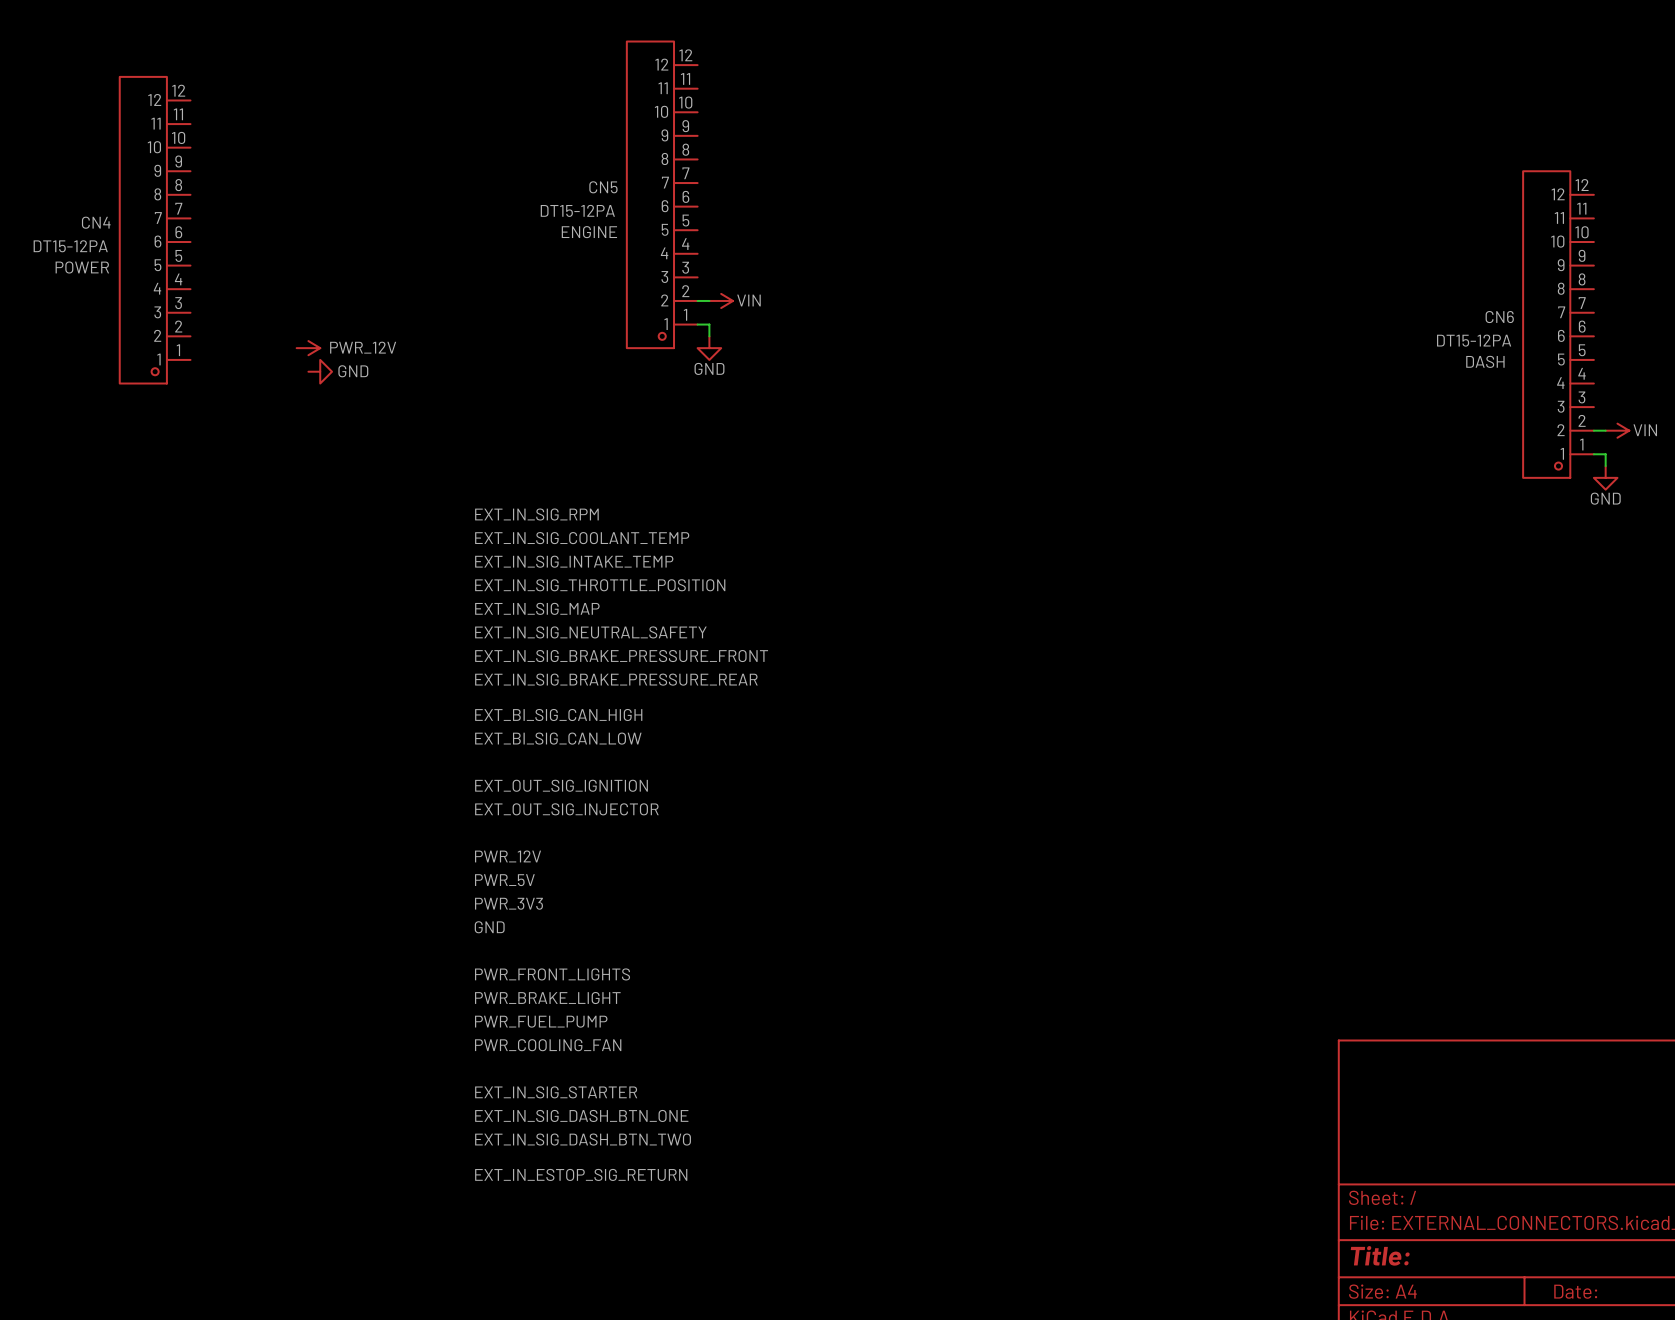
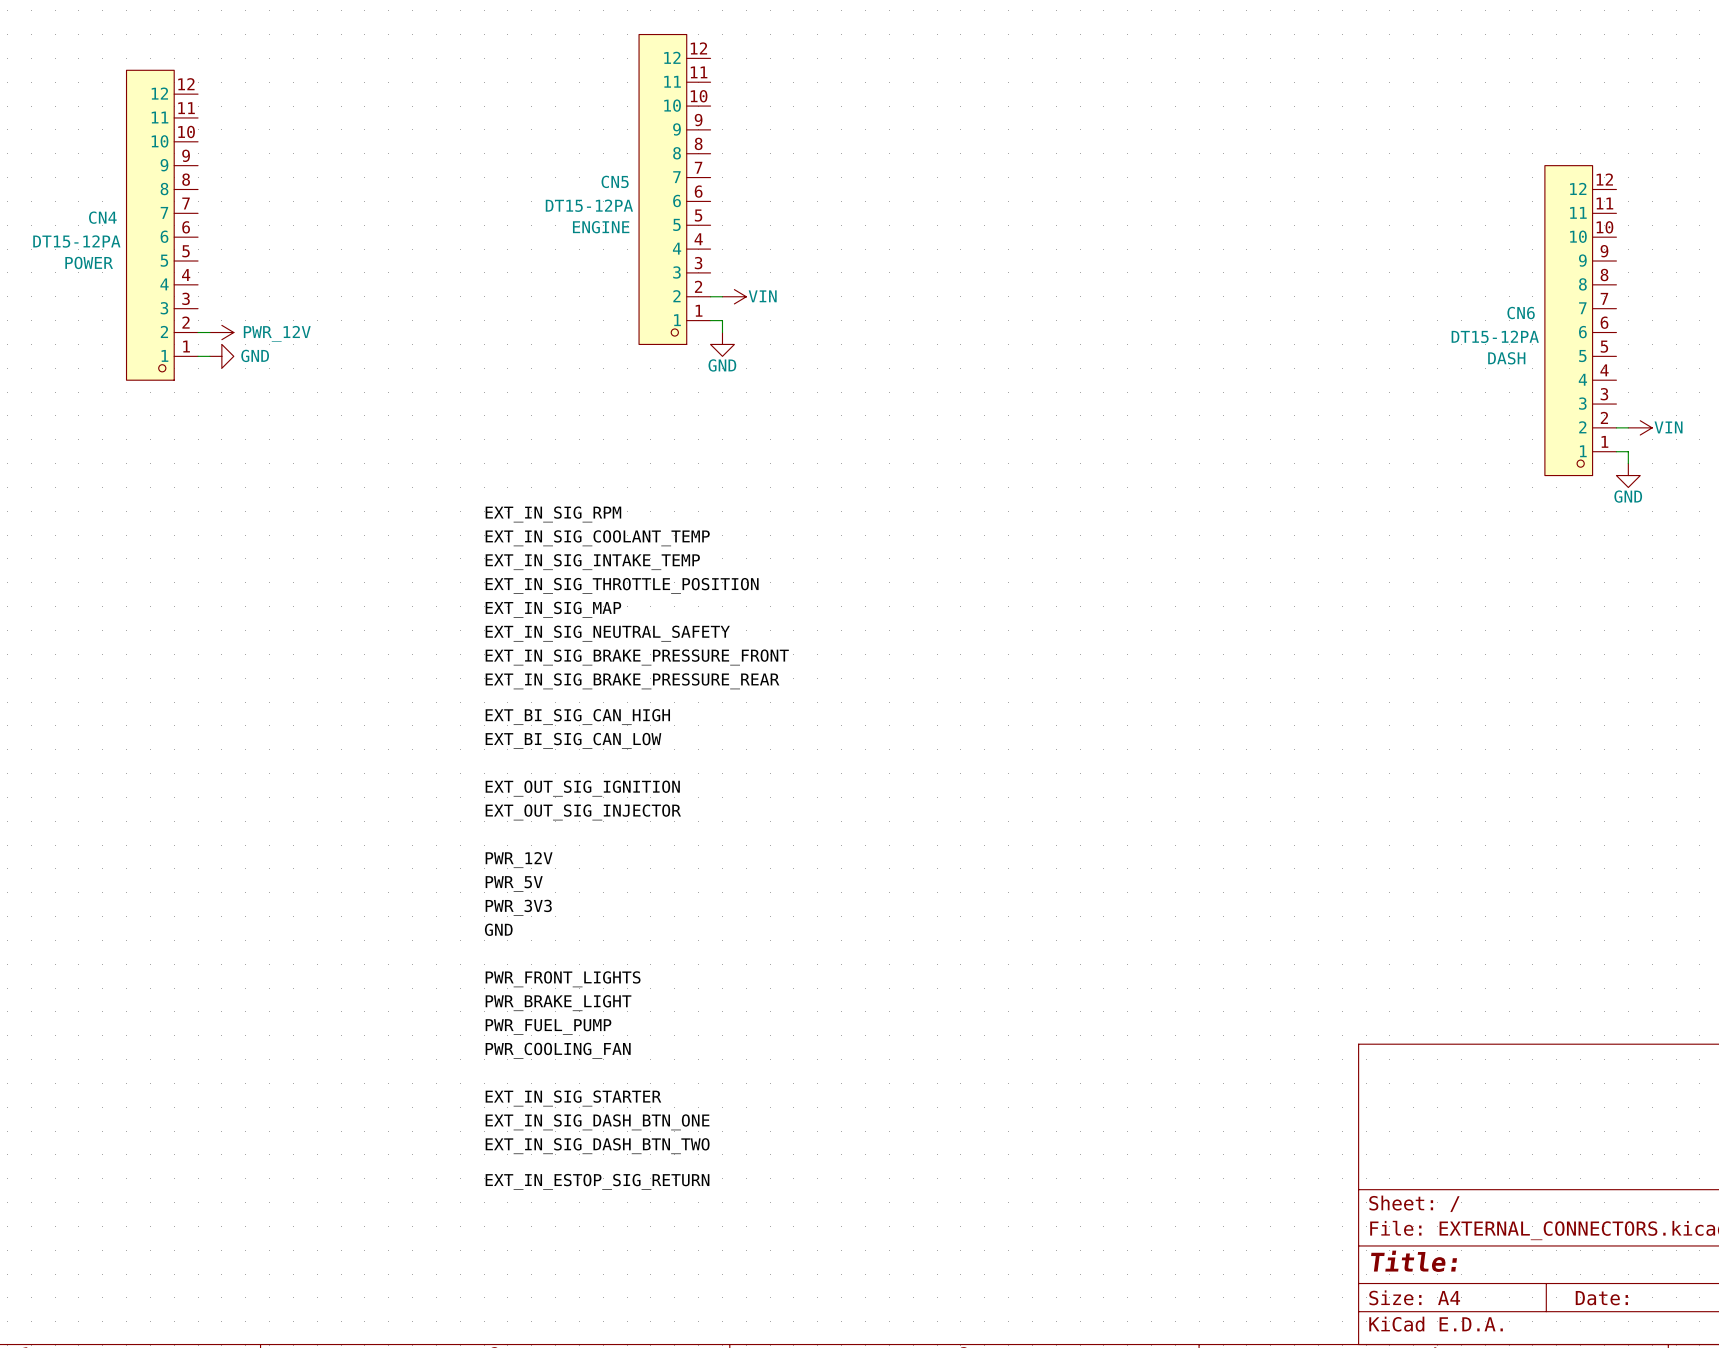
wire: none -> (198, 332) (209, 332)
power symbol position: PWR_12V (308, 348) -> PWR_12V (221, 332)
wire: none -> (198, 356) (209, 356)
power symbol position: GND (320, 371) -> GND (221, 356)

